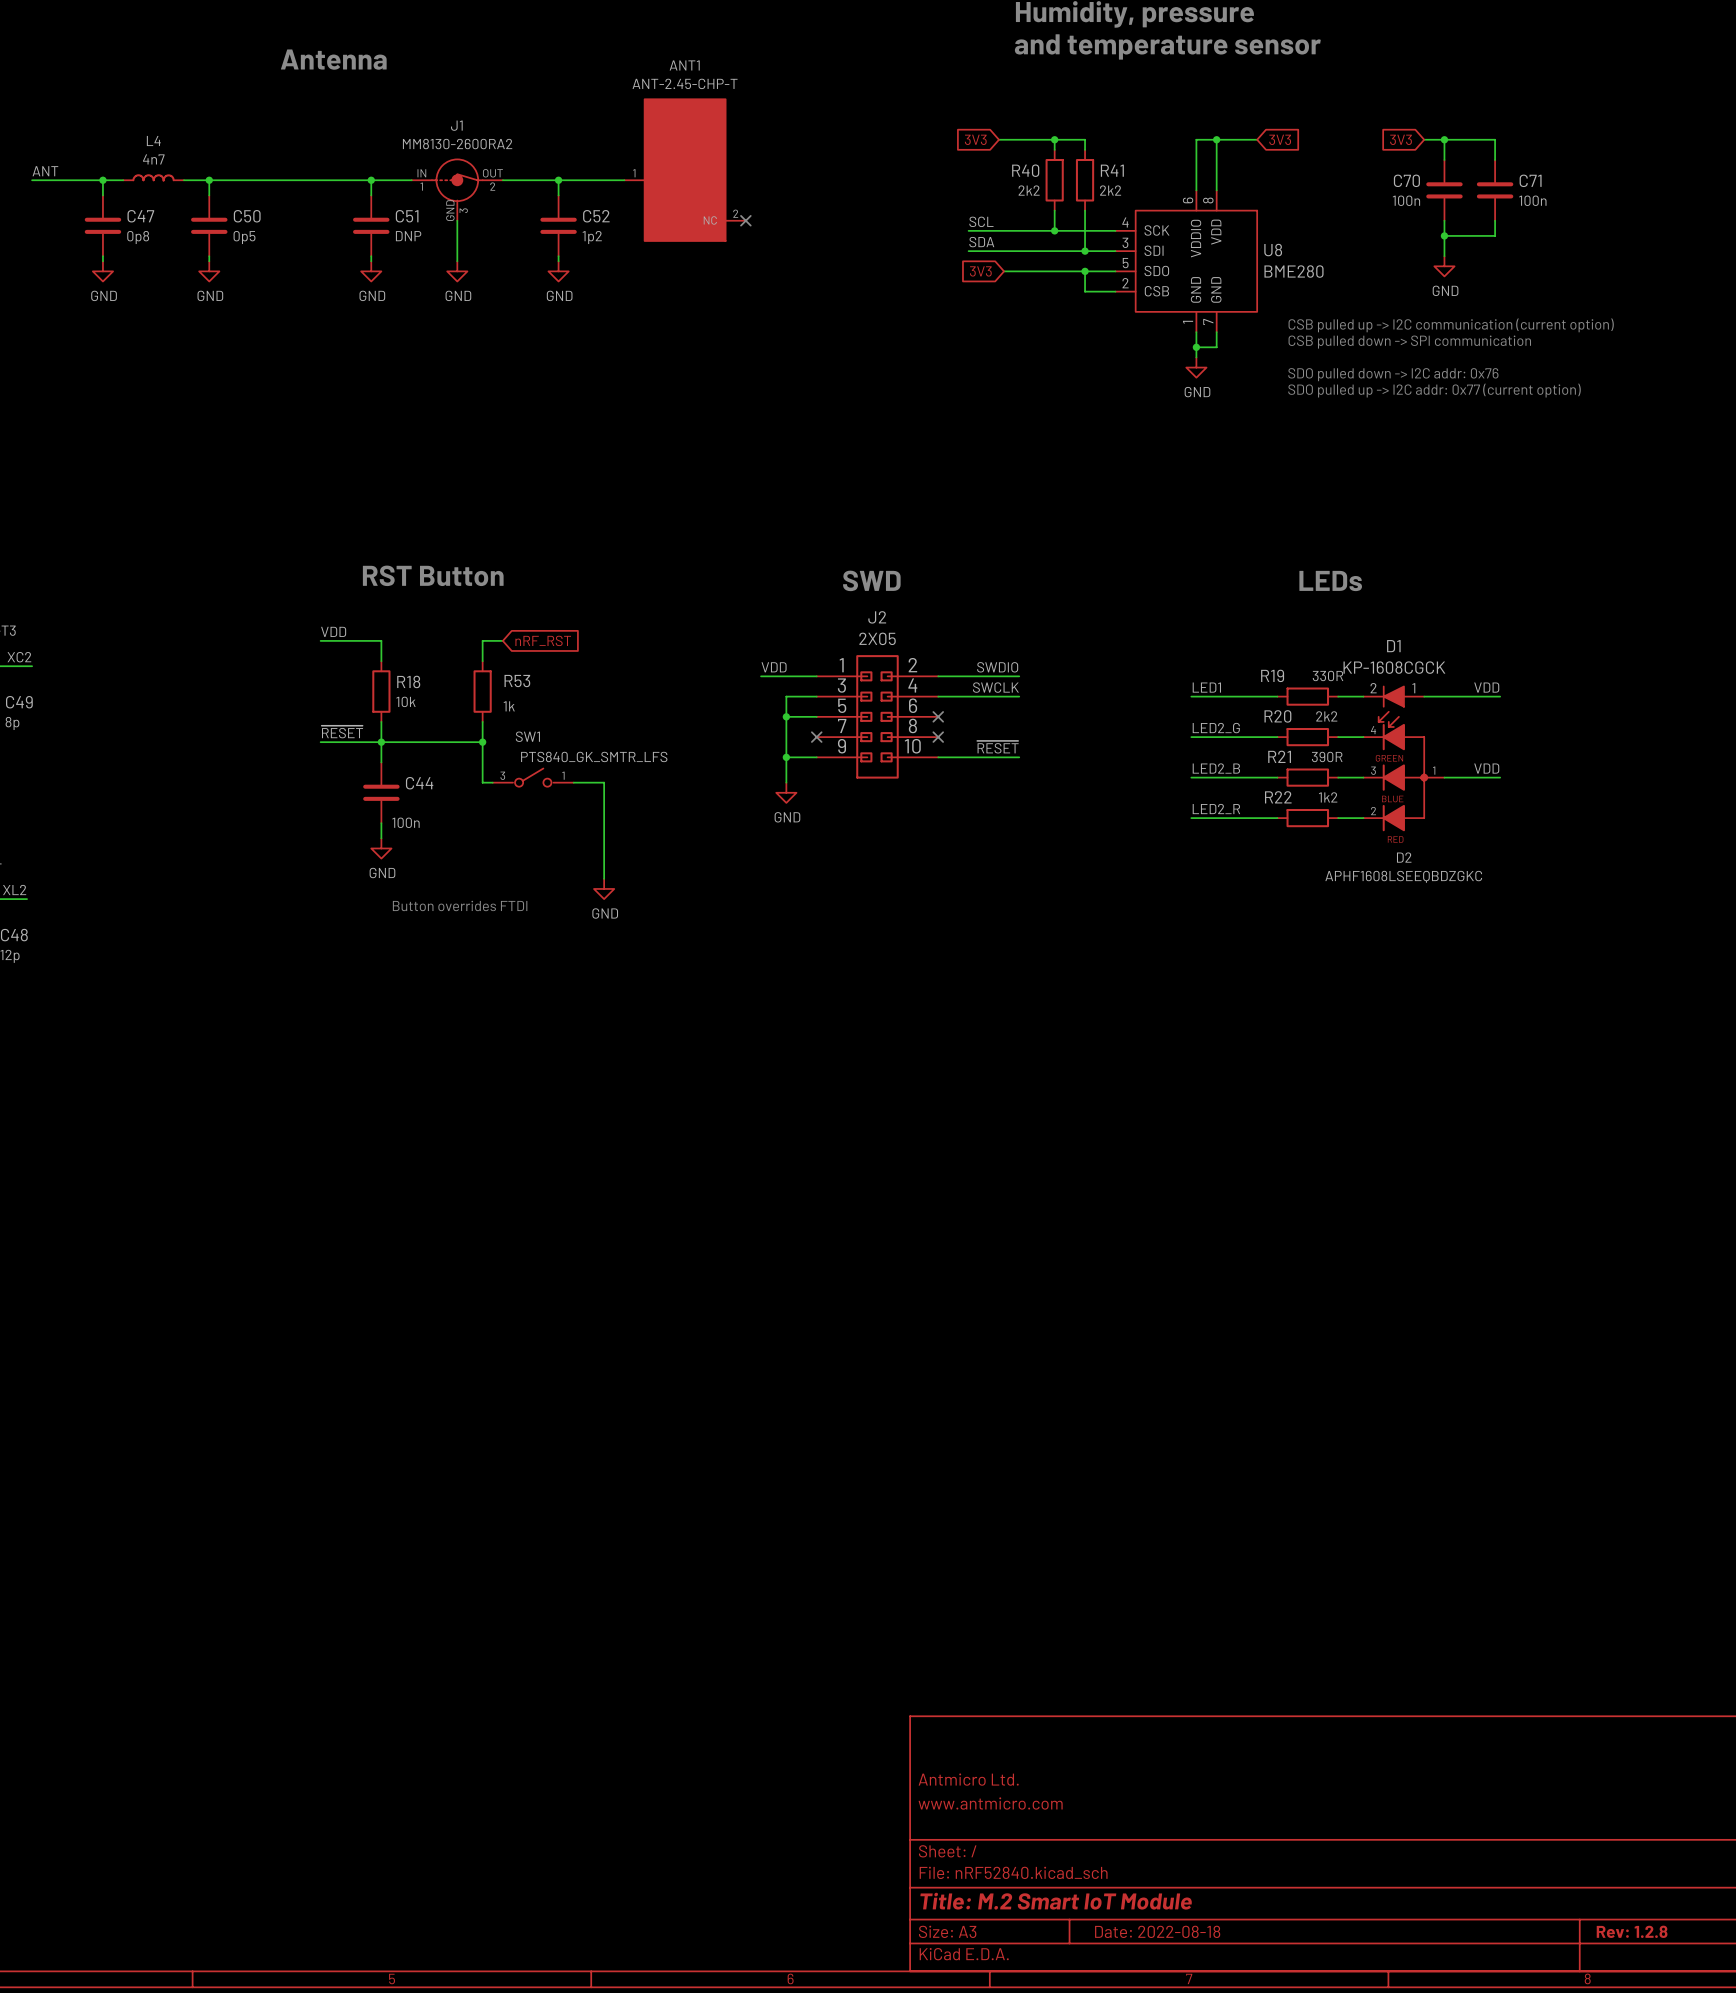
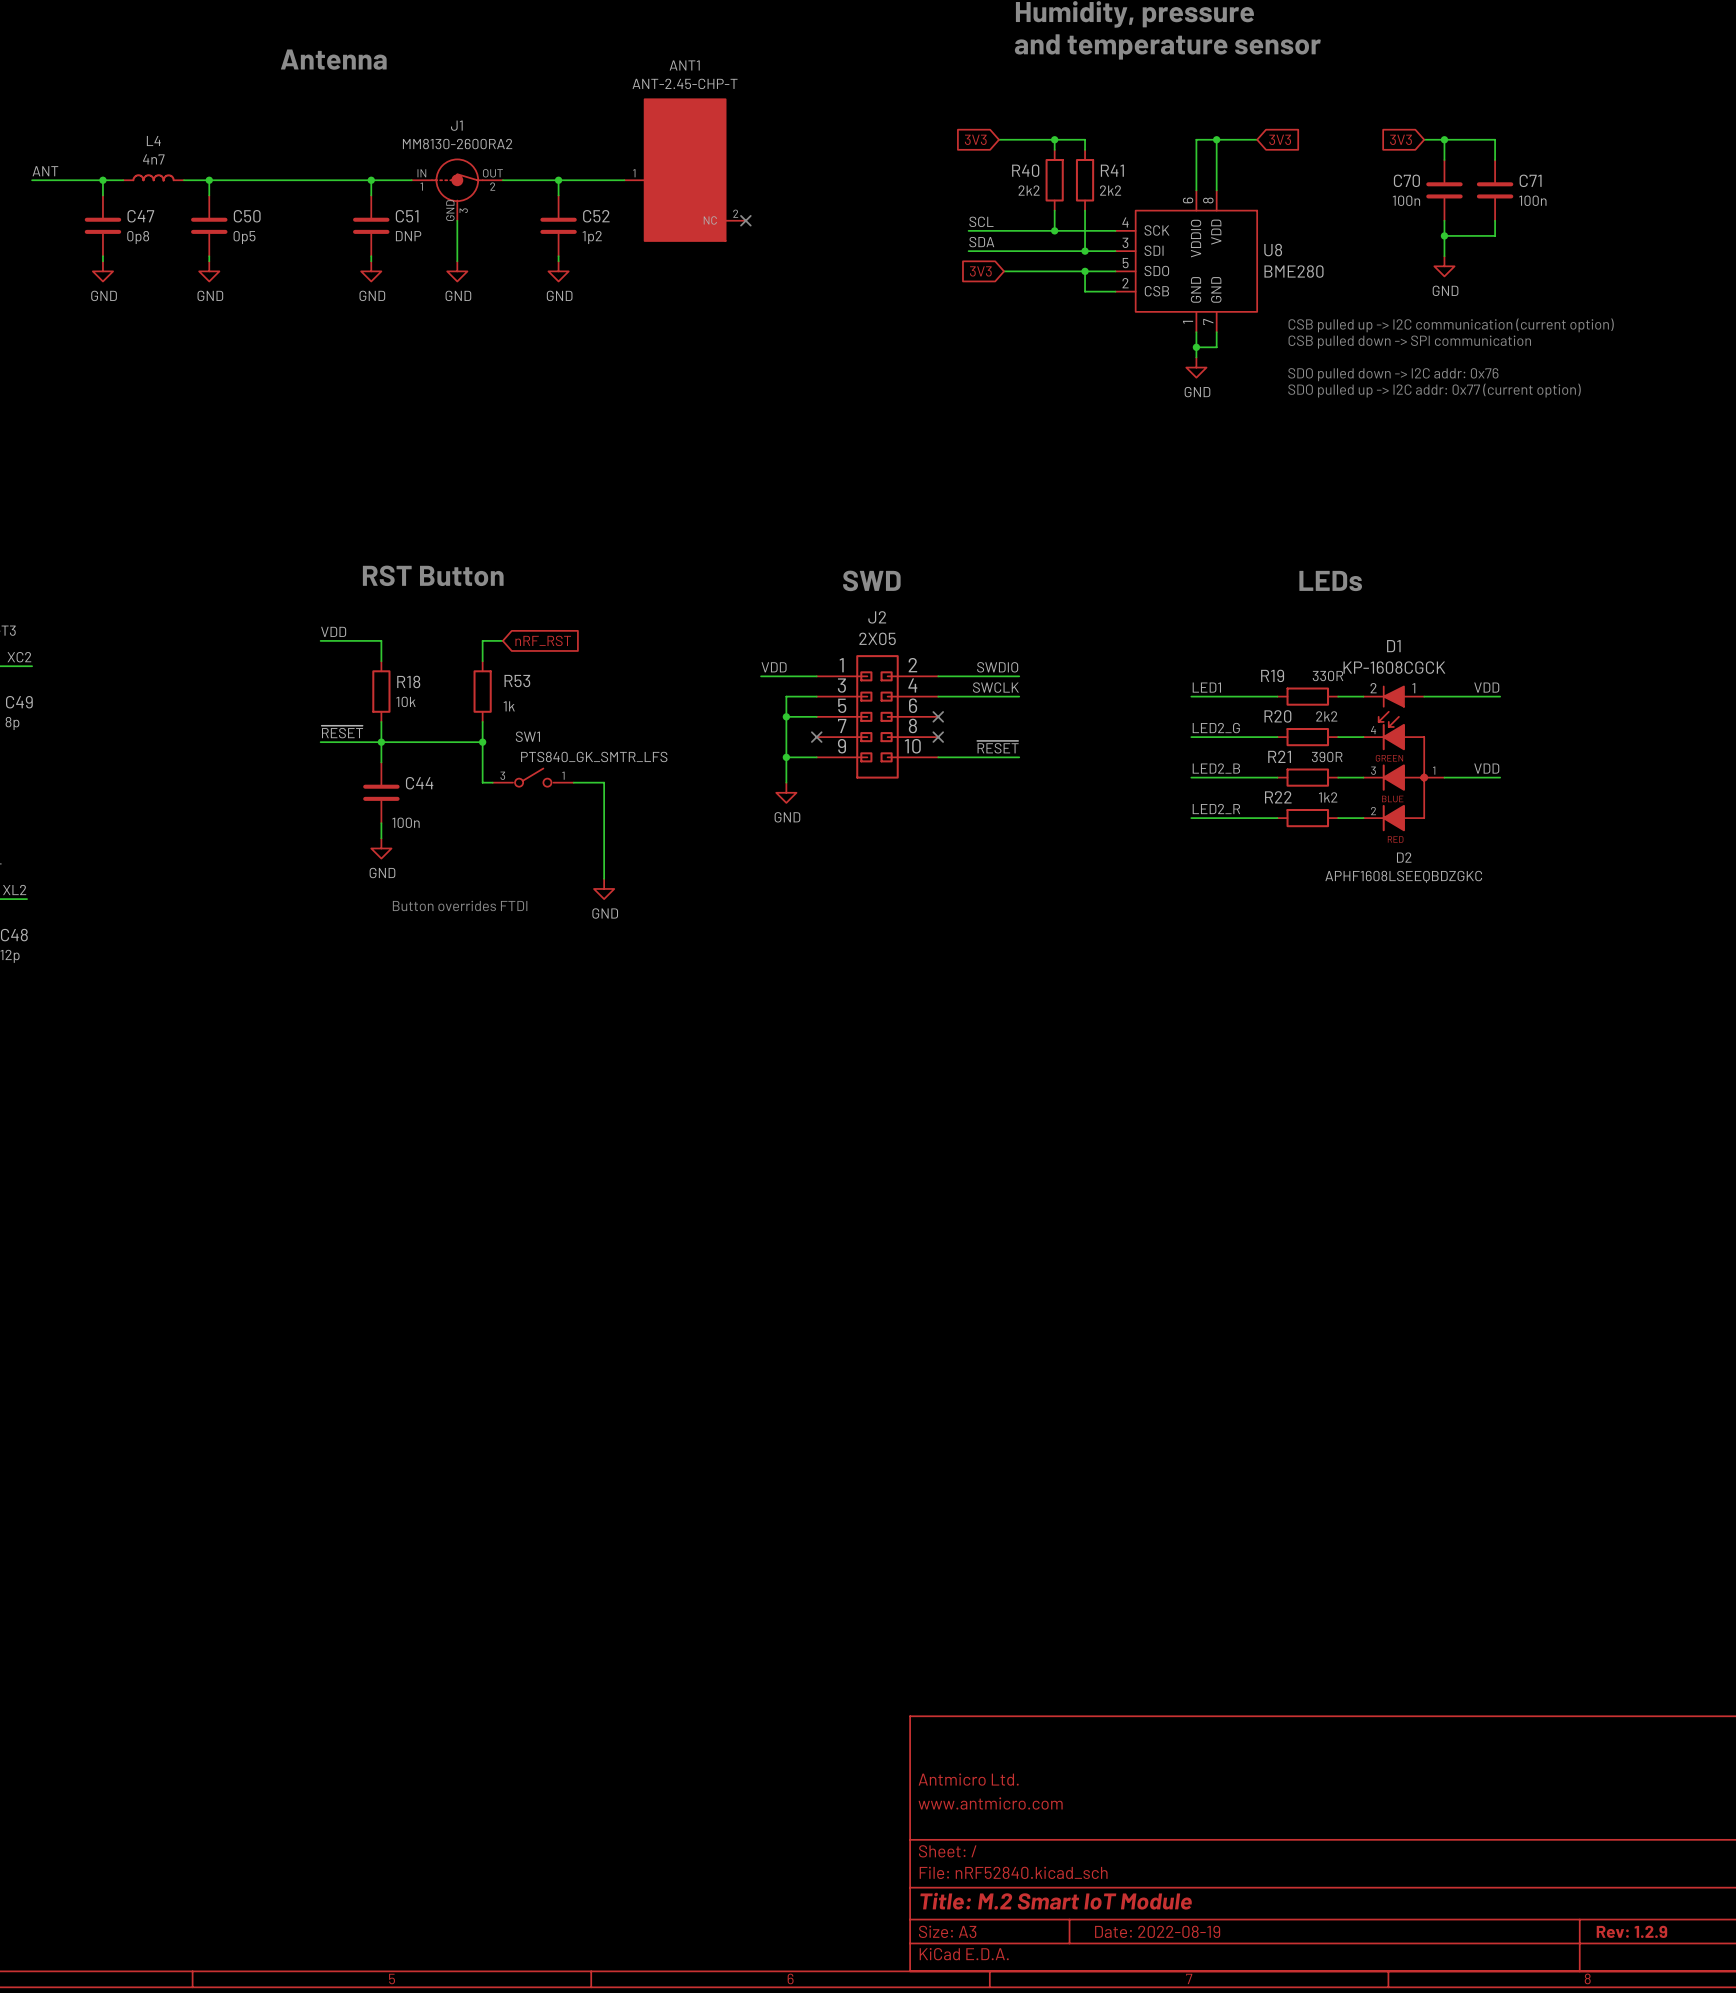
title block: Date: 2022-08-18 (1157, 1931) -> Date: 2022-08-19 (1157, 1931)
title block: Rev: 1.2.8 (1632, 1931) -> Rev: 1.2.9 (1631, 1931)

